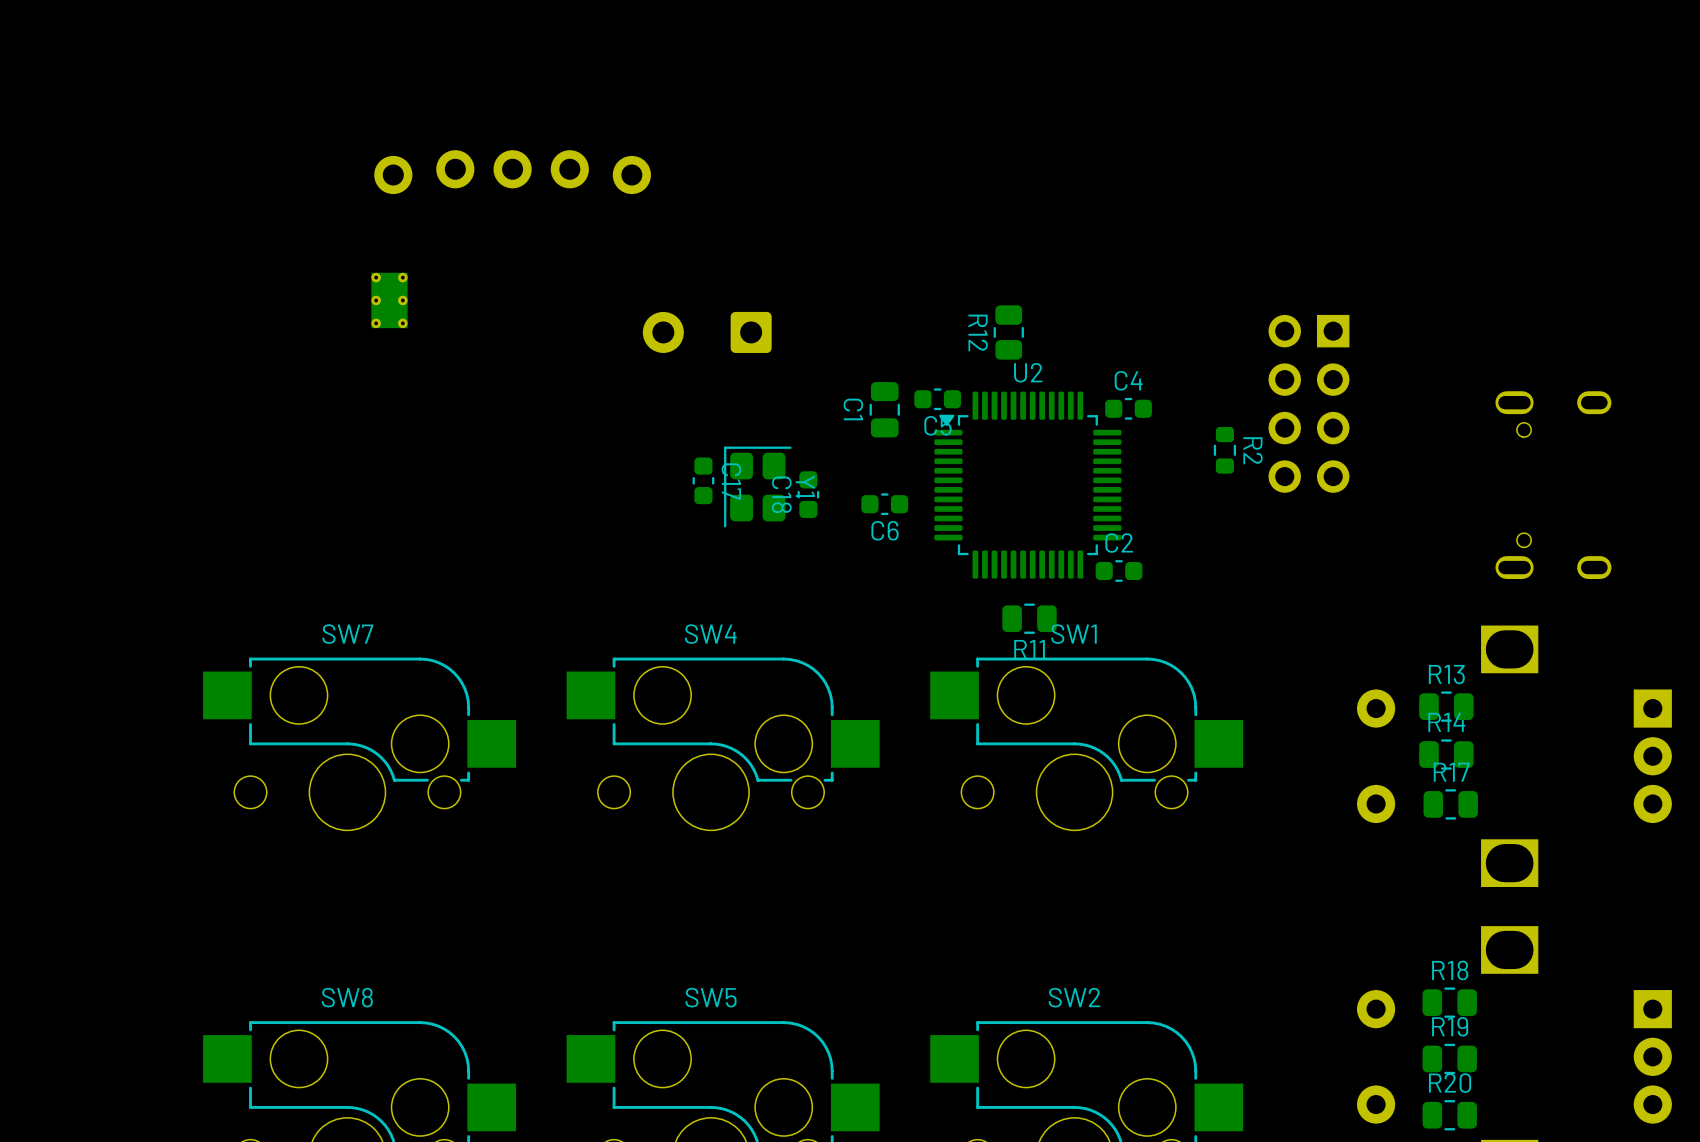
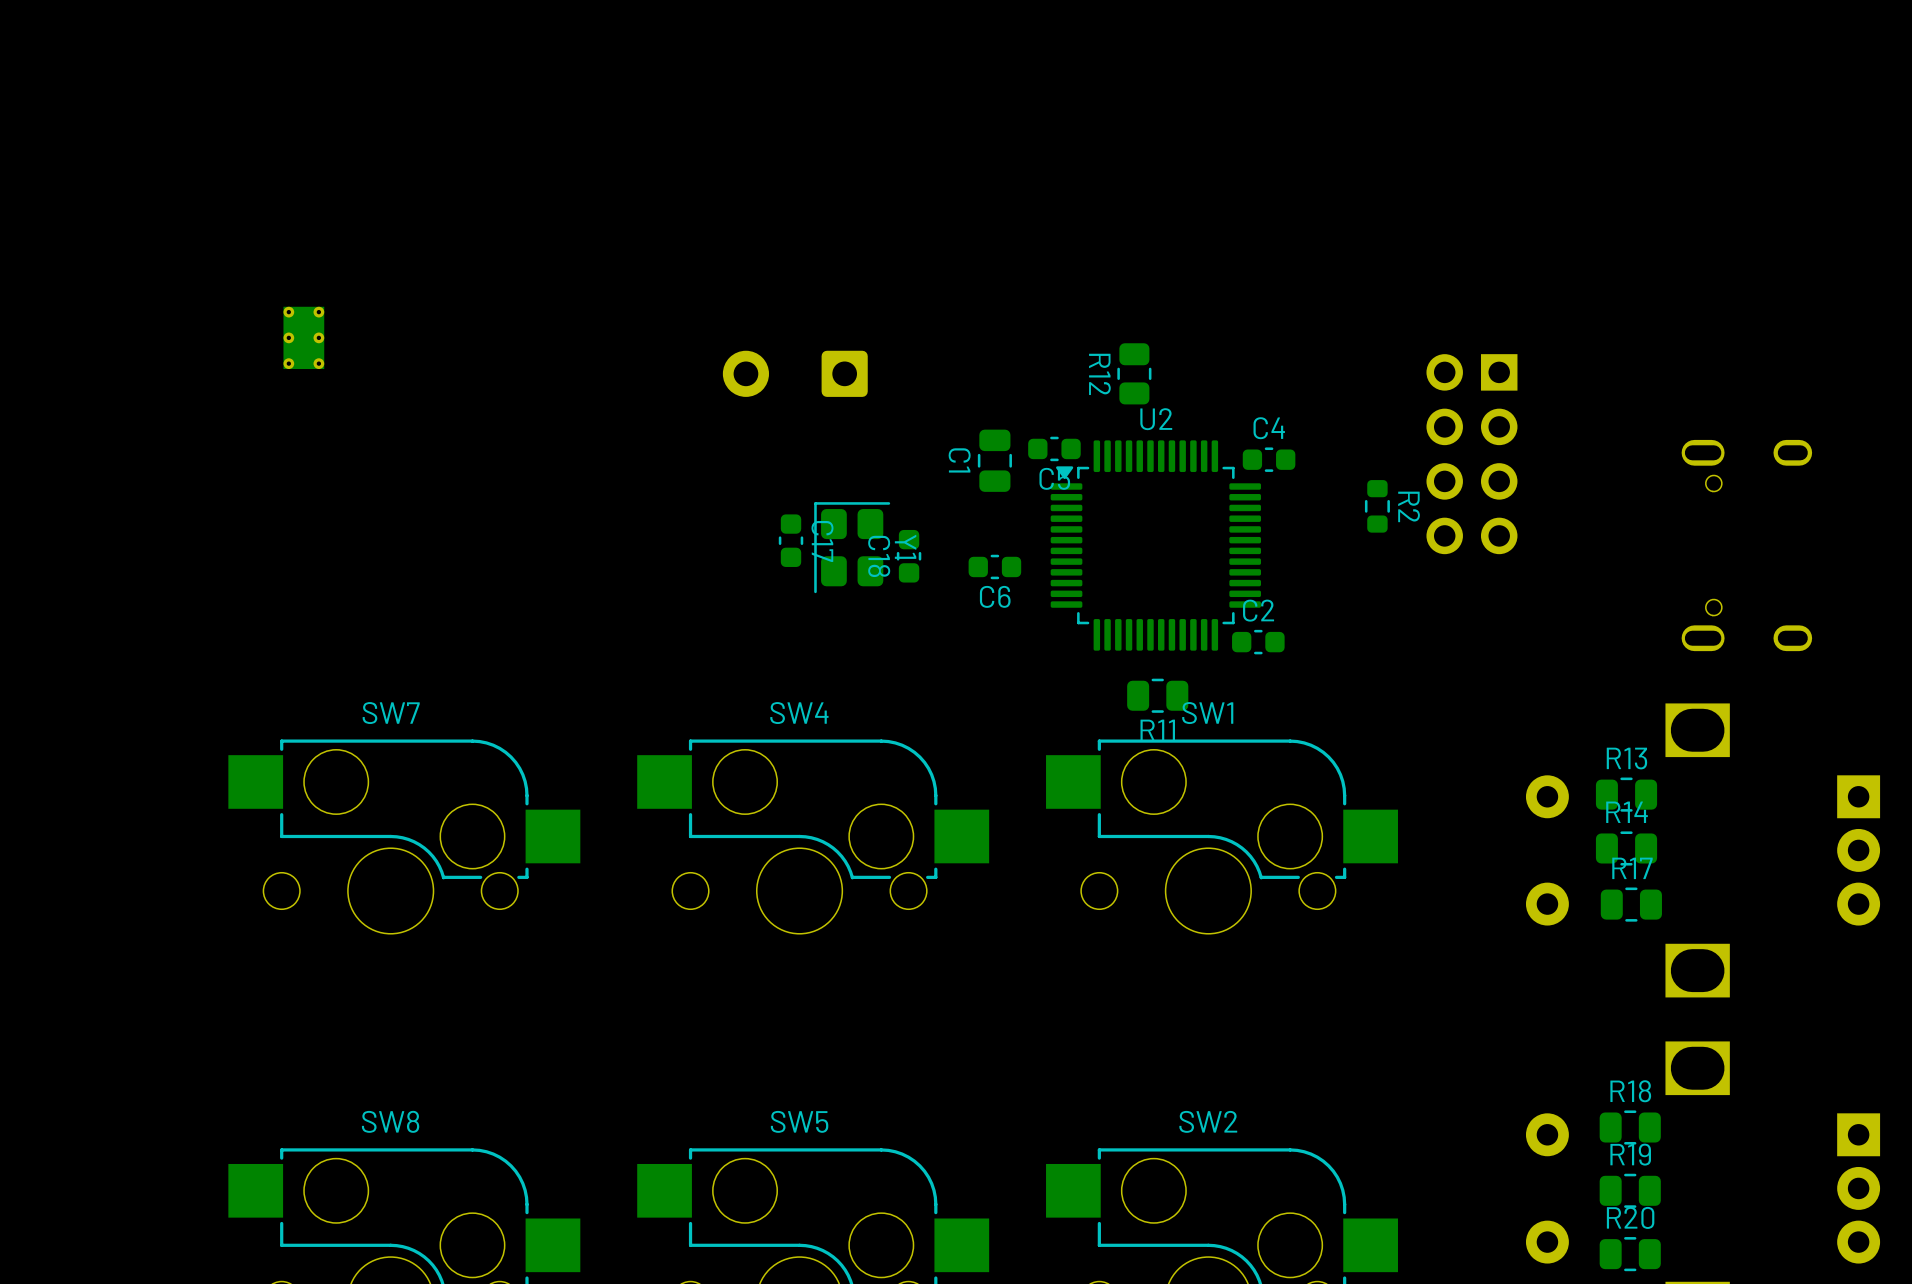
part: (512, 172) -> none
part position: (389, 300) -> (303, 337)

